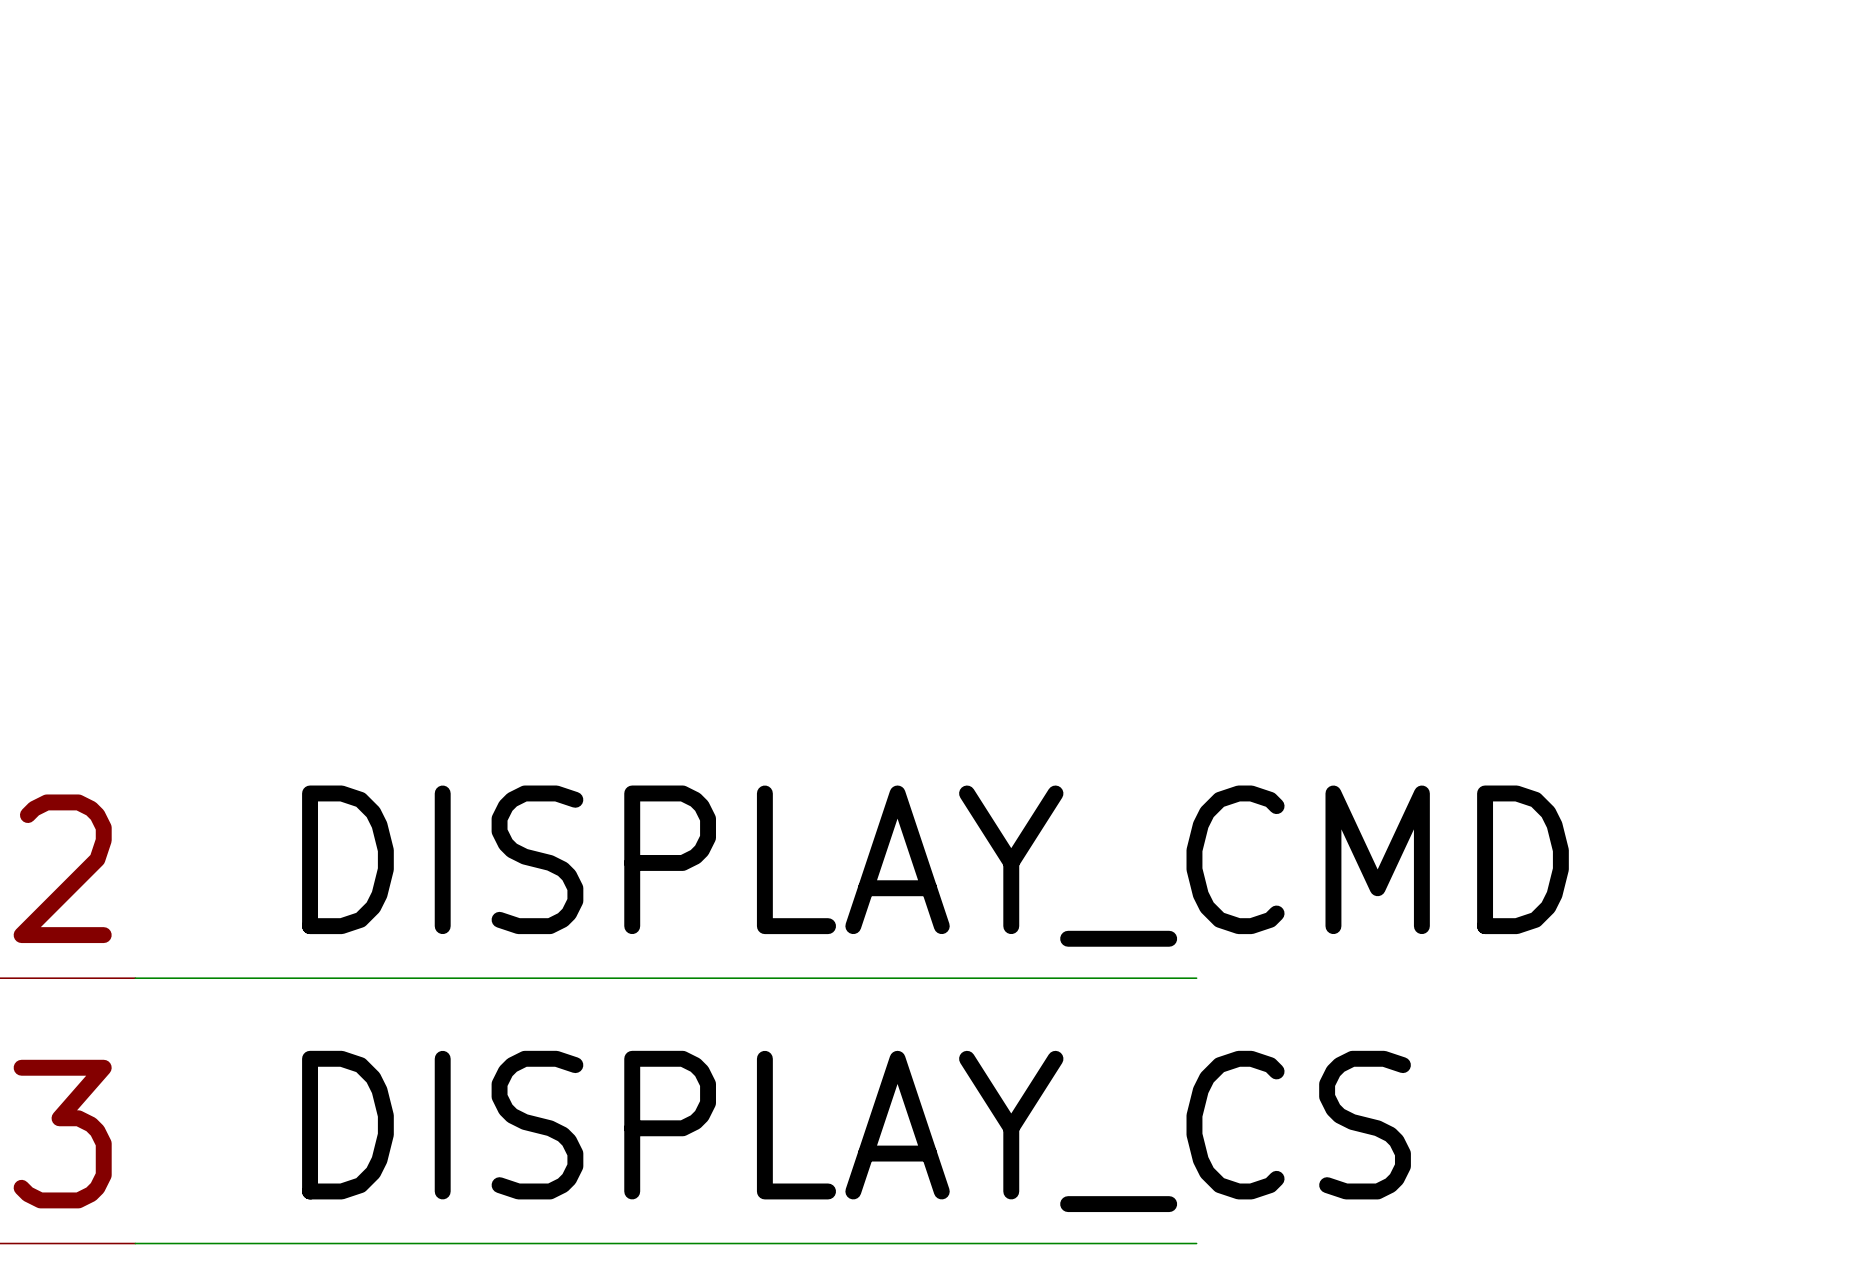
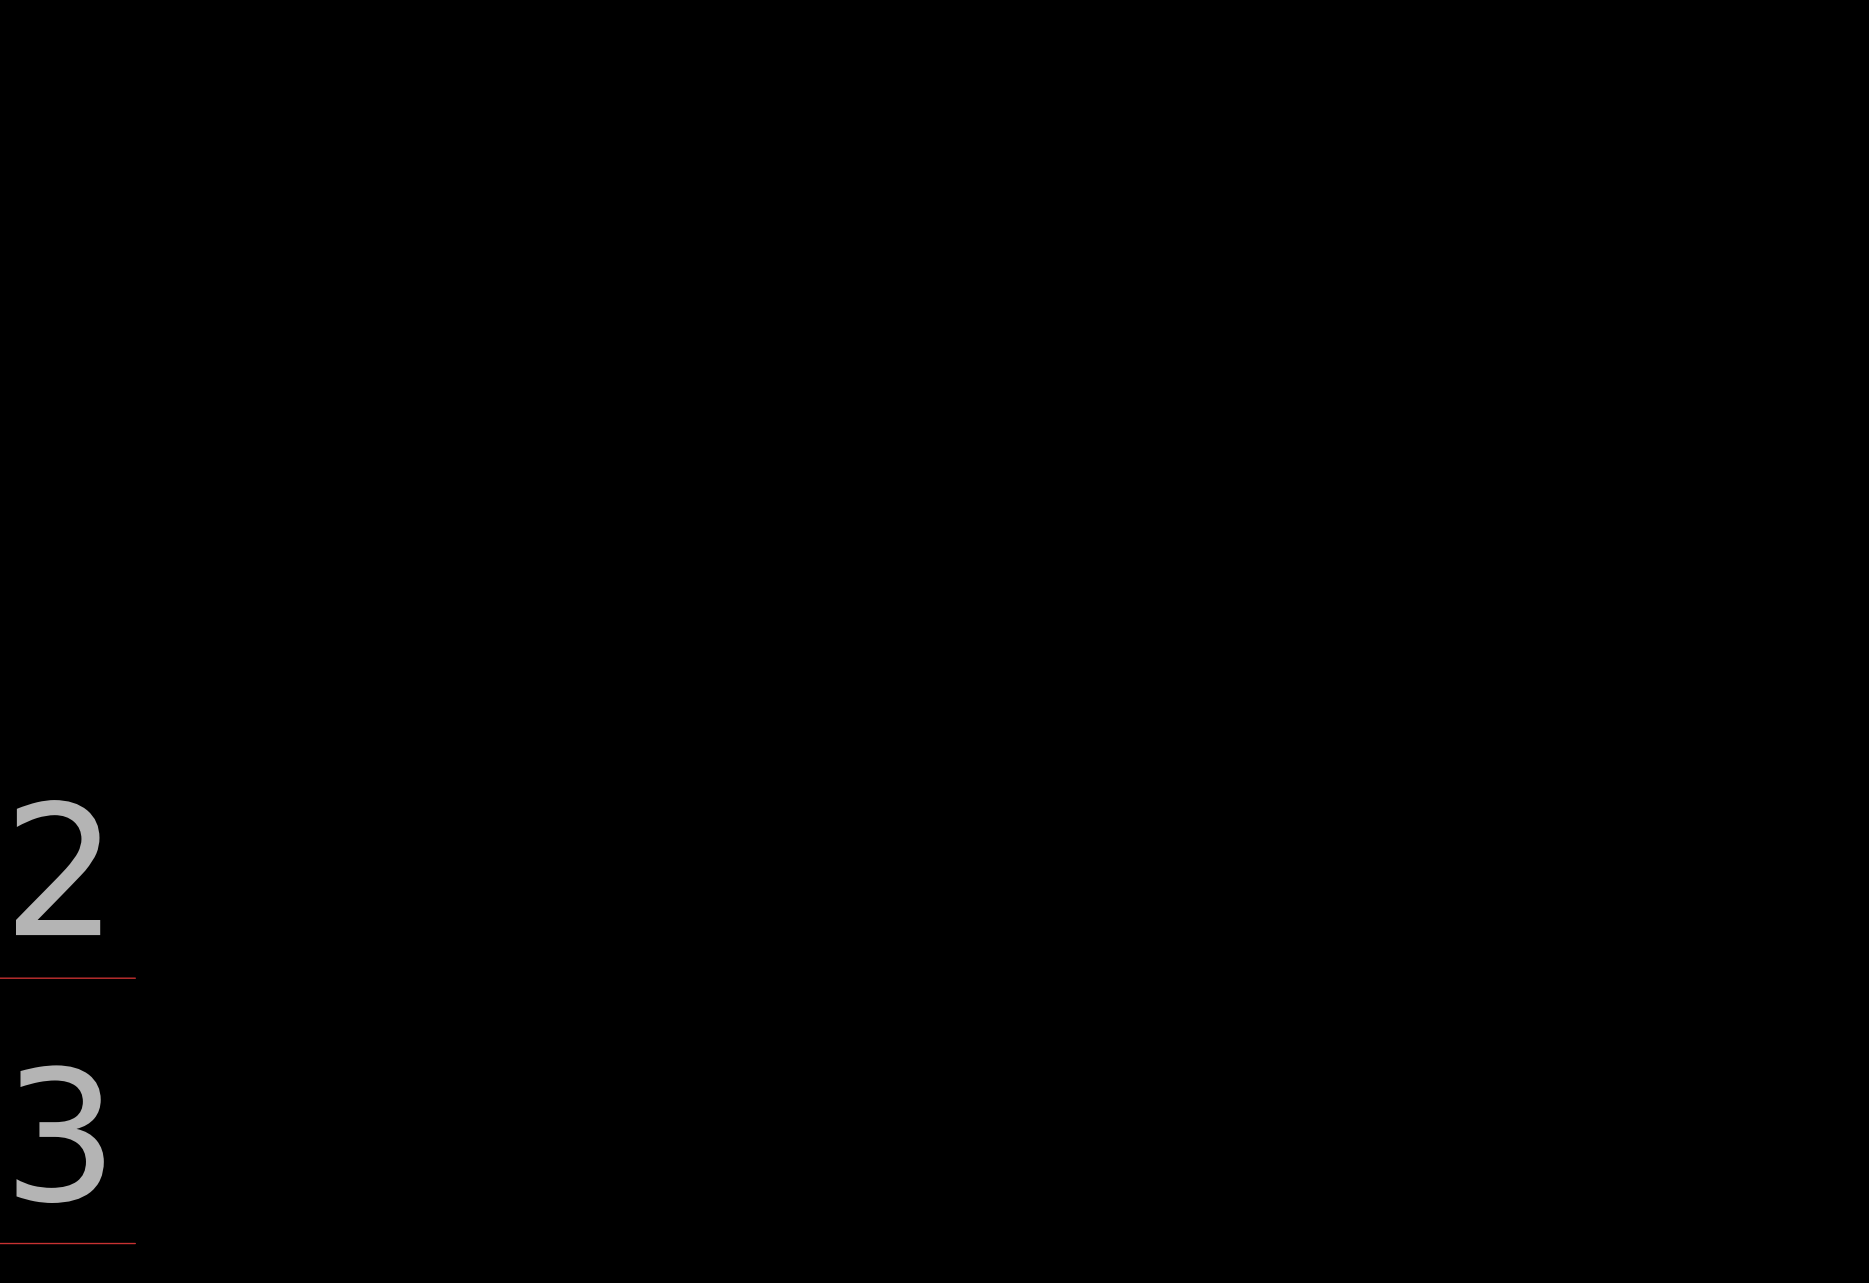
label: DISPLAY_CMD (935, 866) -> none
wire: (135, 978) (1196, 978) -> none
label: DISPLAY_CS (856, 1131) -> none
wire: (135, 1243) (1196, 1243) -> none

